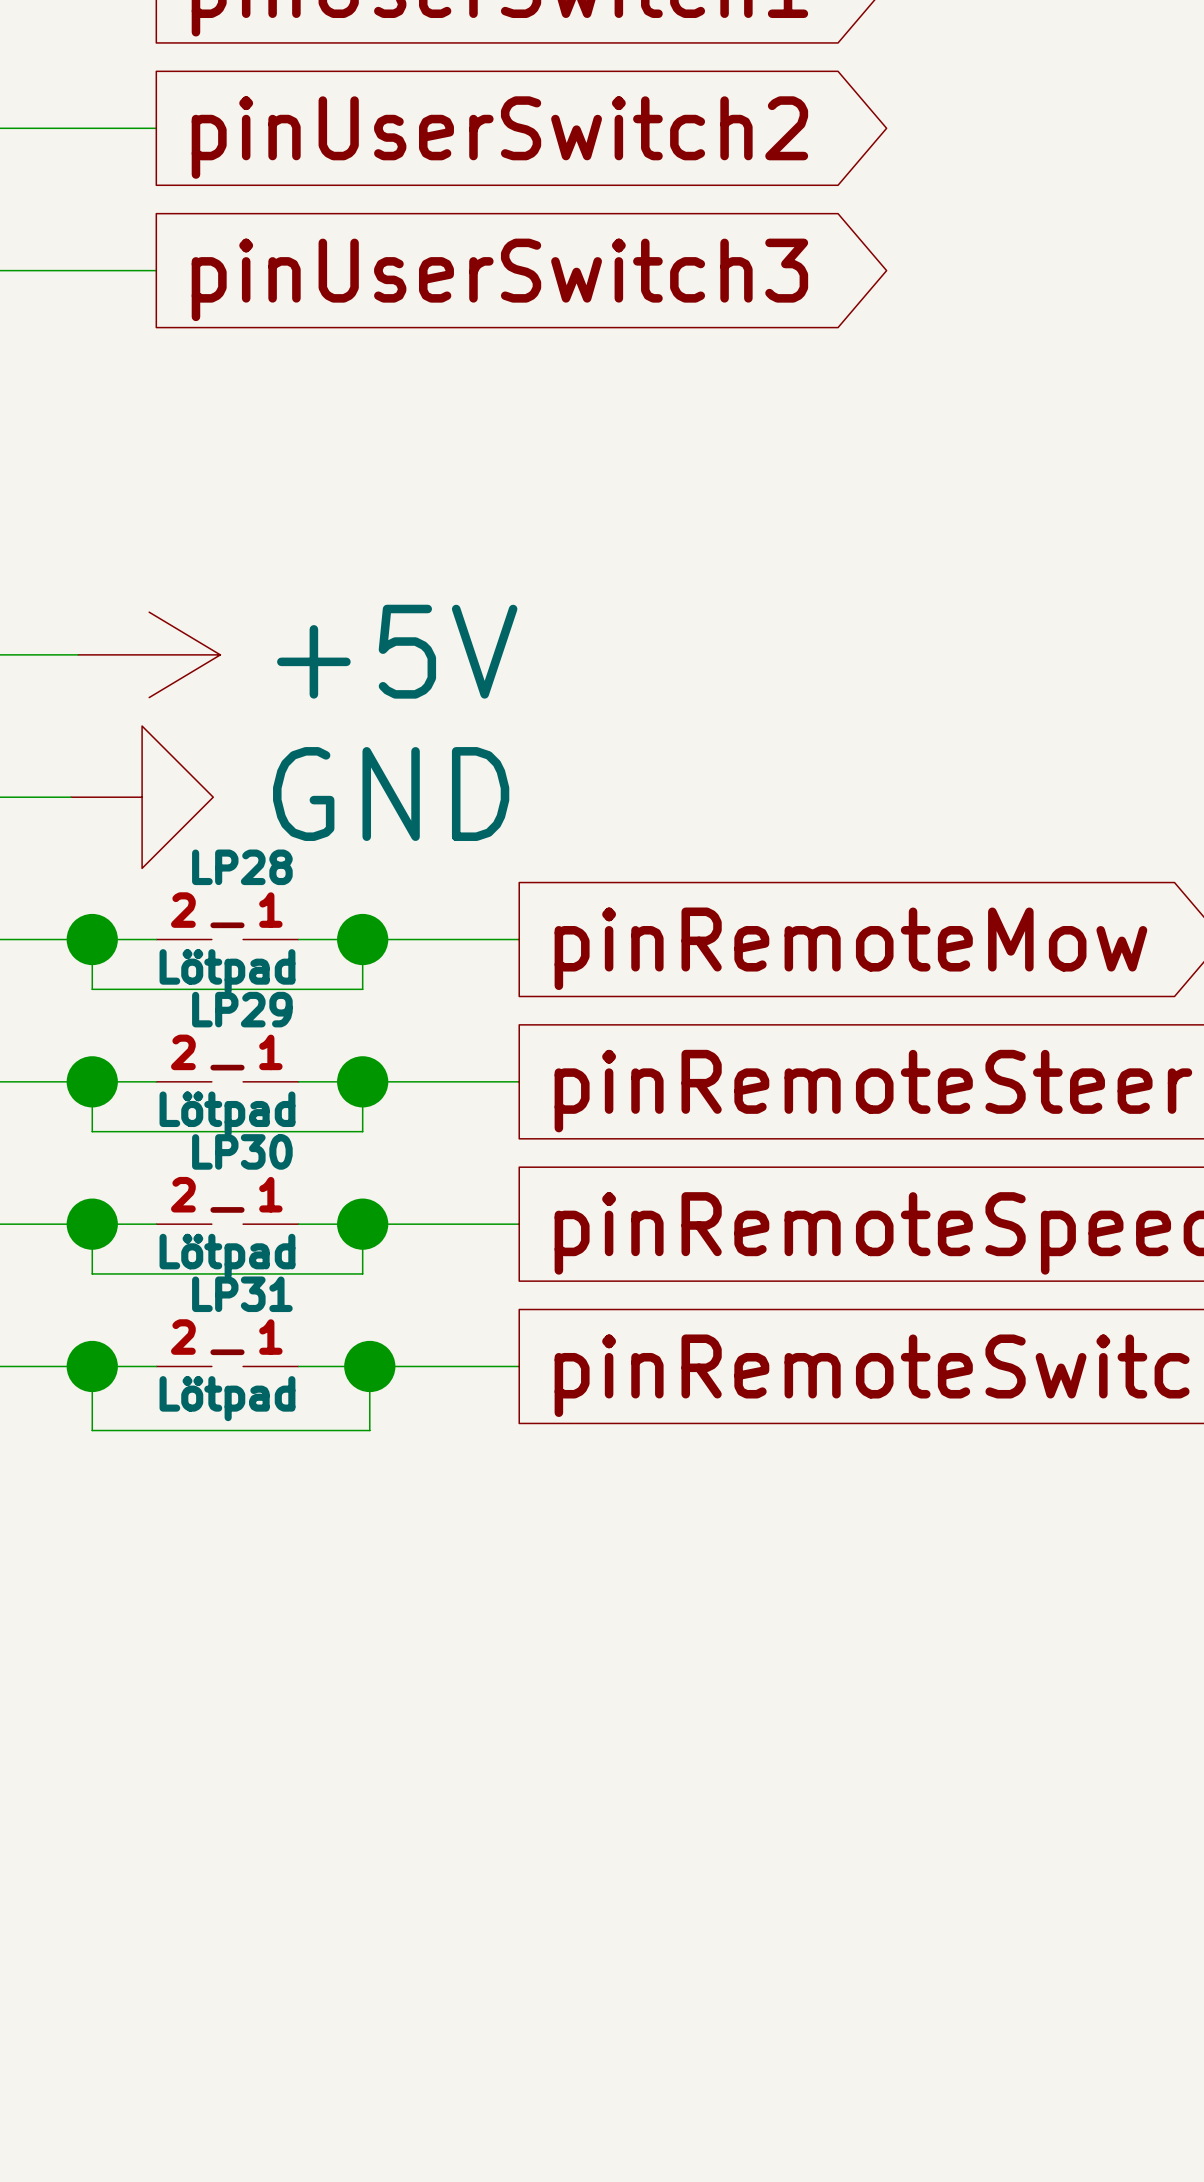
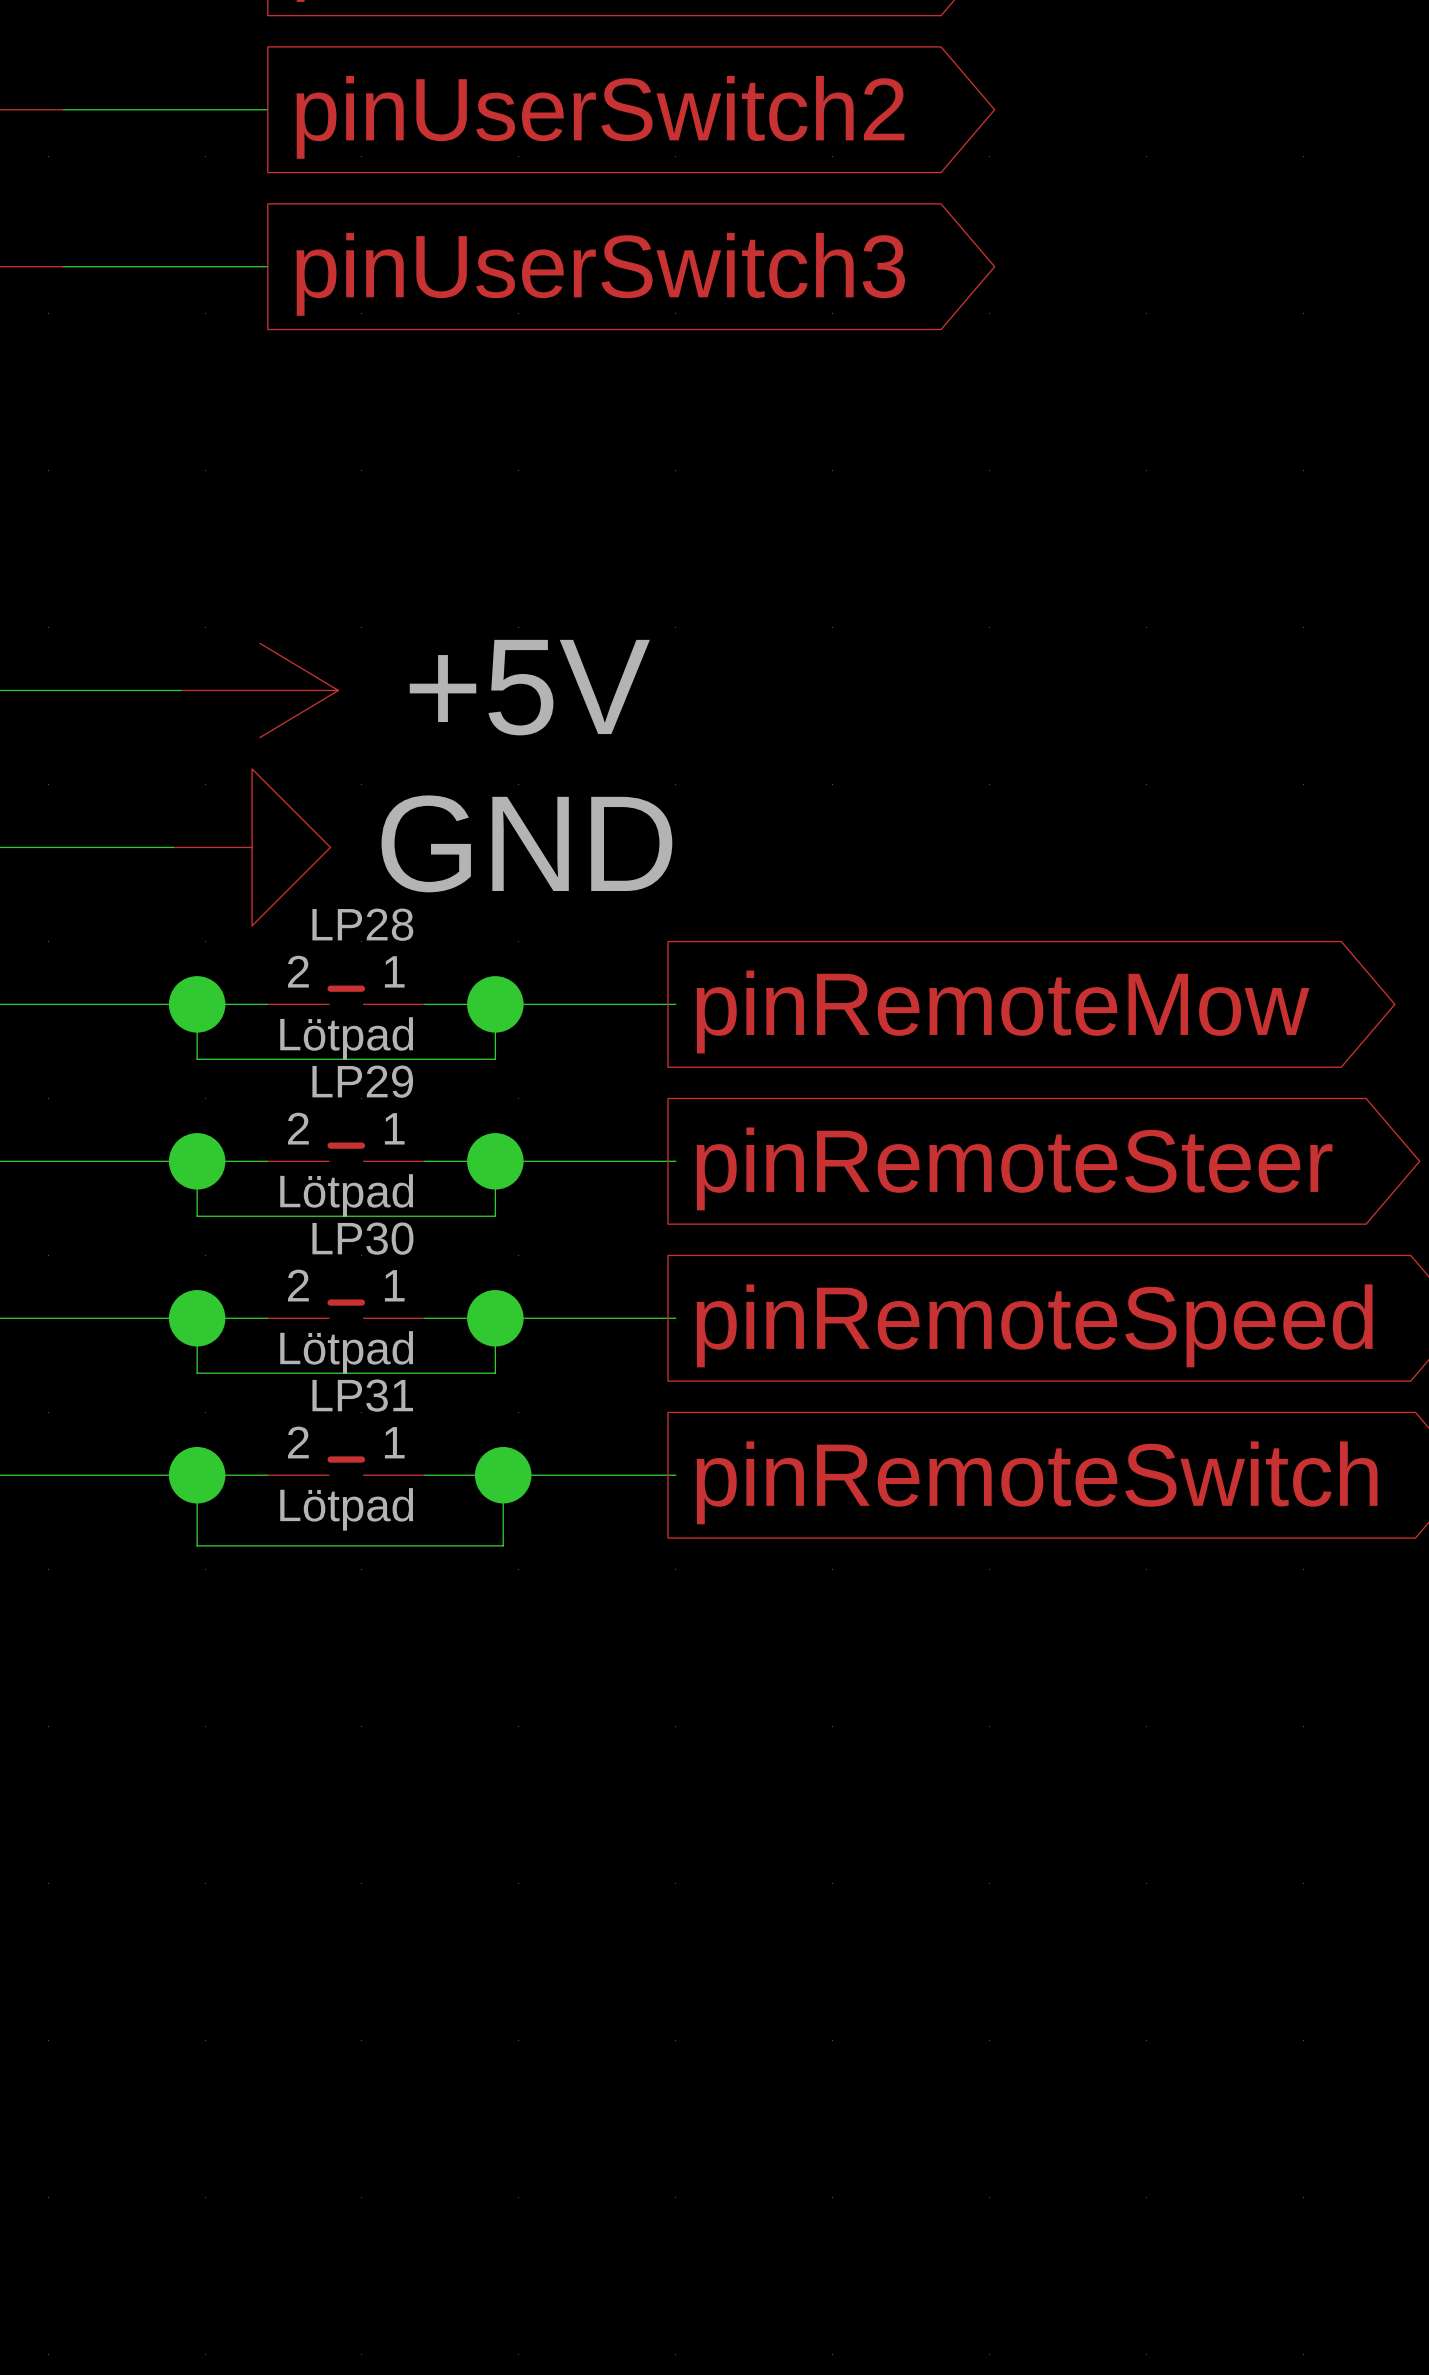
wire: none -> (668, 1004) (675, 1004)
wire: none -> (668, 1161) (675, 1161)
wire: none -> (668, 1318) (675, 1318)
wire: none -> (668, 1475) (675, 1475)

